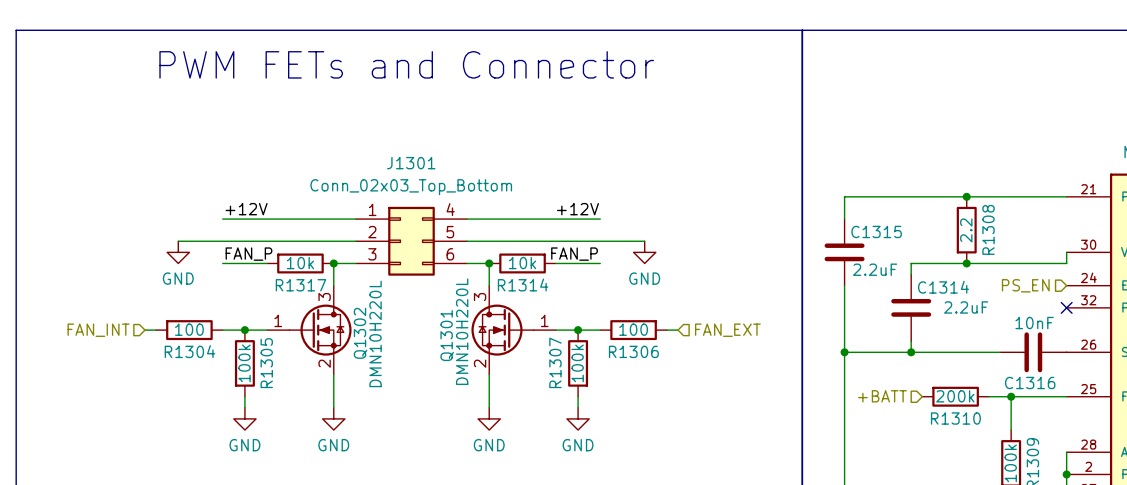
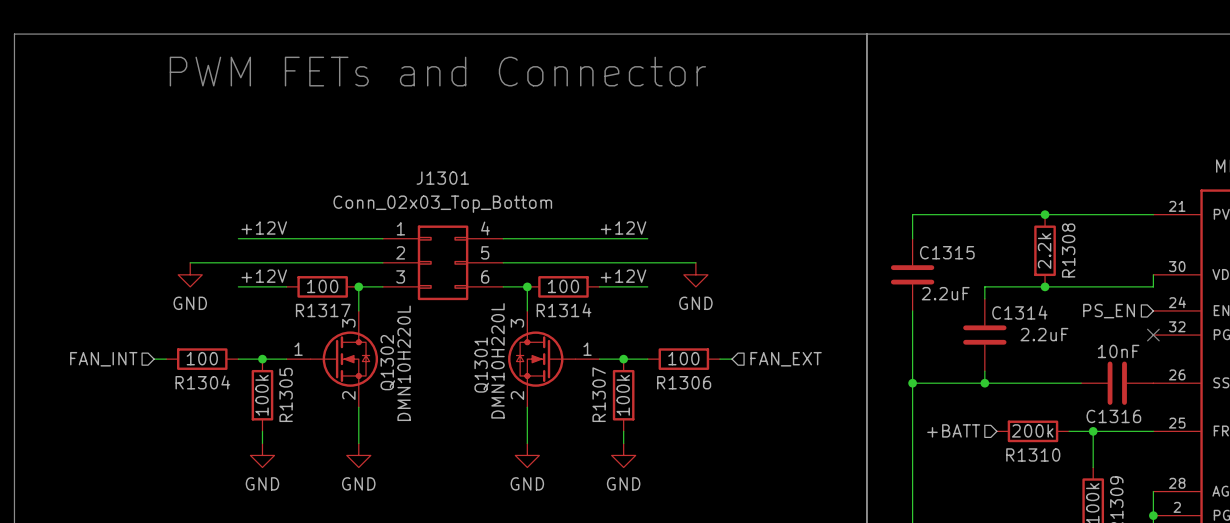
R1308 value: 2.2 (966, 230) -> 2.2k (1044, 251)
label: FAN_P (248, 254) -> +12V (264, 276)
label: FAN_P (574, 254) -> +12V (623, 276)
R1317 value: 10k (300, 263) -> 100 (322, 286)
R1314 value: 10k (522, 263) -> 100 (563, 286)

